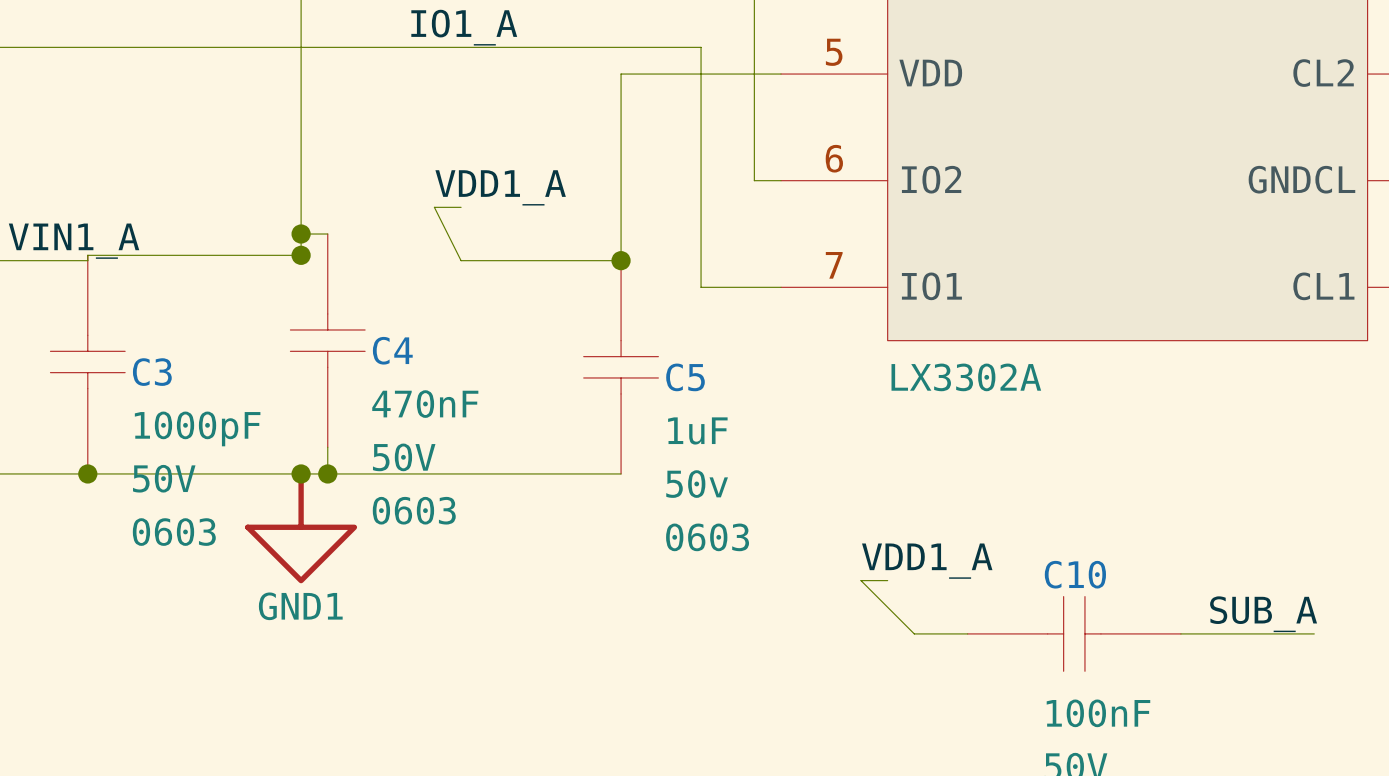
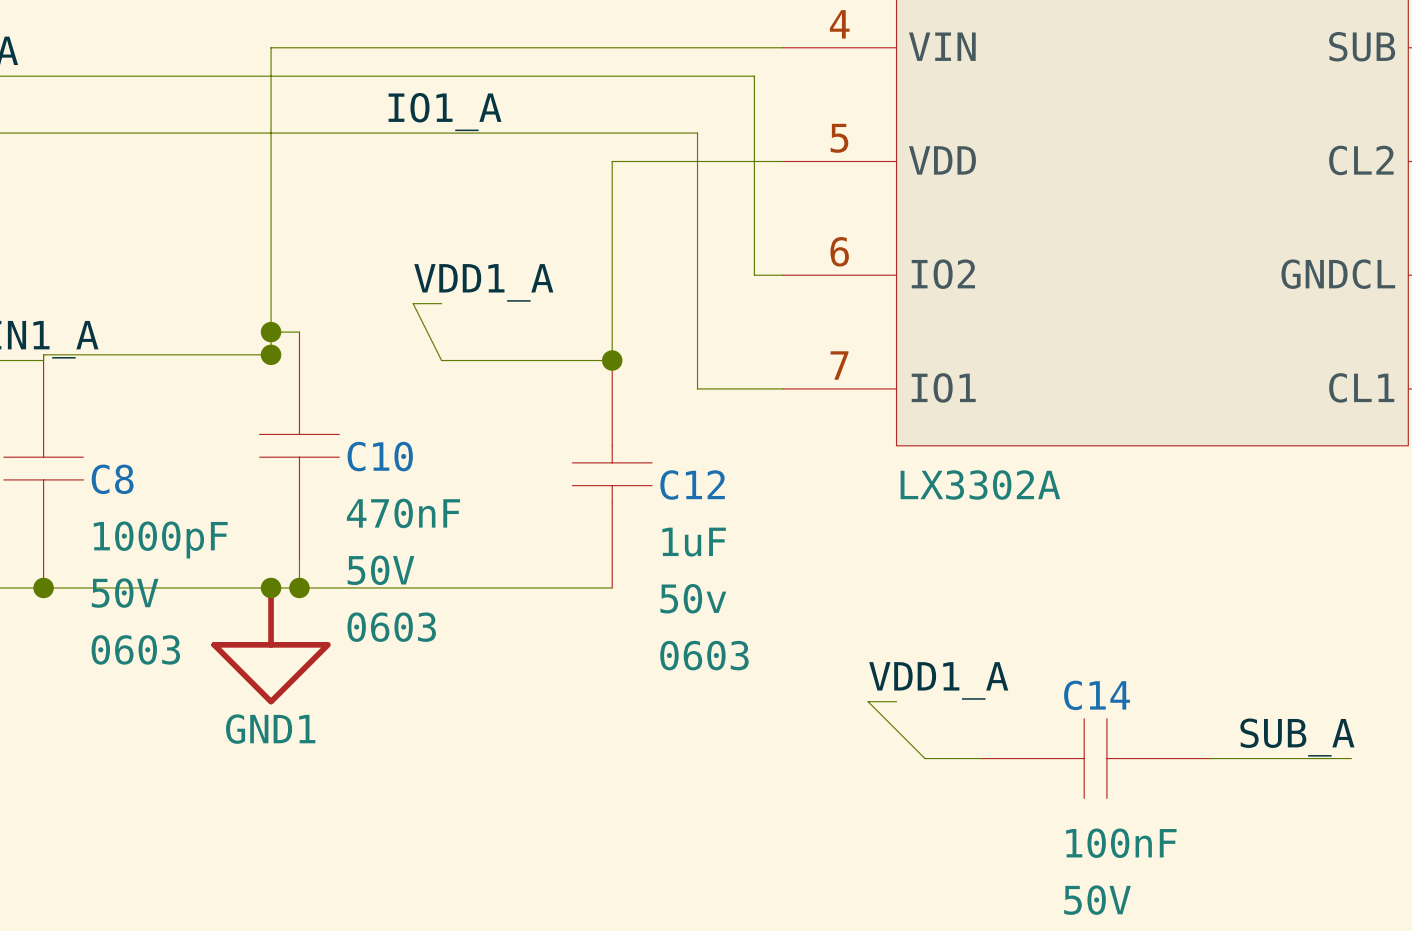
C4 name: C4 (392, 350) -> C10 (380, 456)
C3 name: C3 (152, 372) -> C8 (112, 479)
C5 name: C5 (685, 377) -> C12 (692, 485)
C10 name: C10 (1075, 574) -> C14 (1097, 695)

